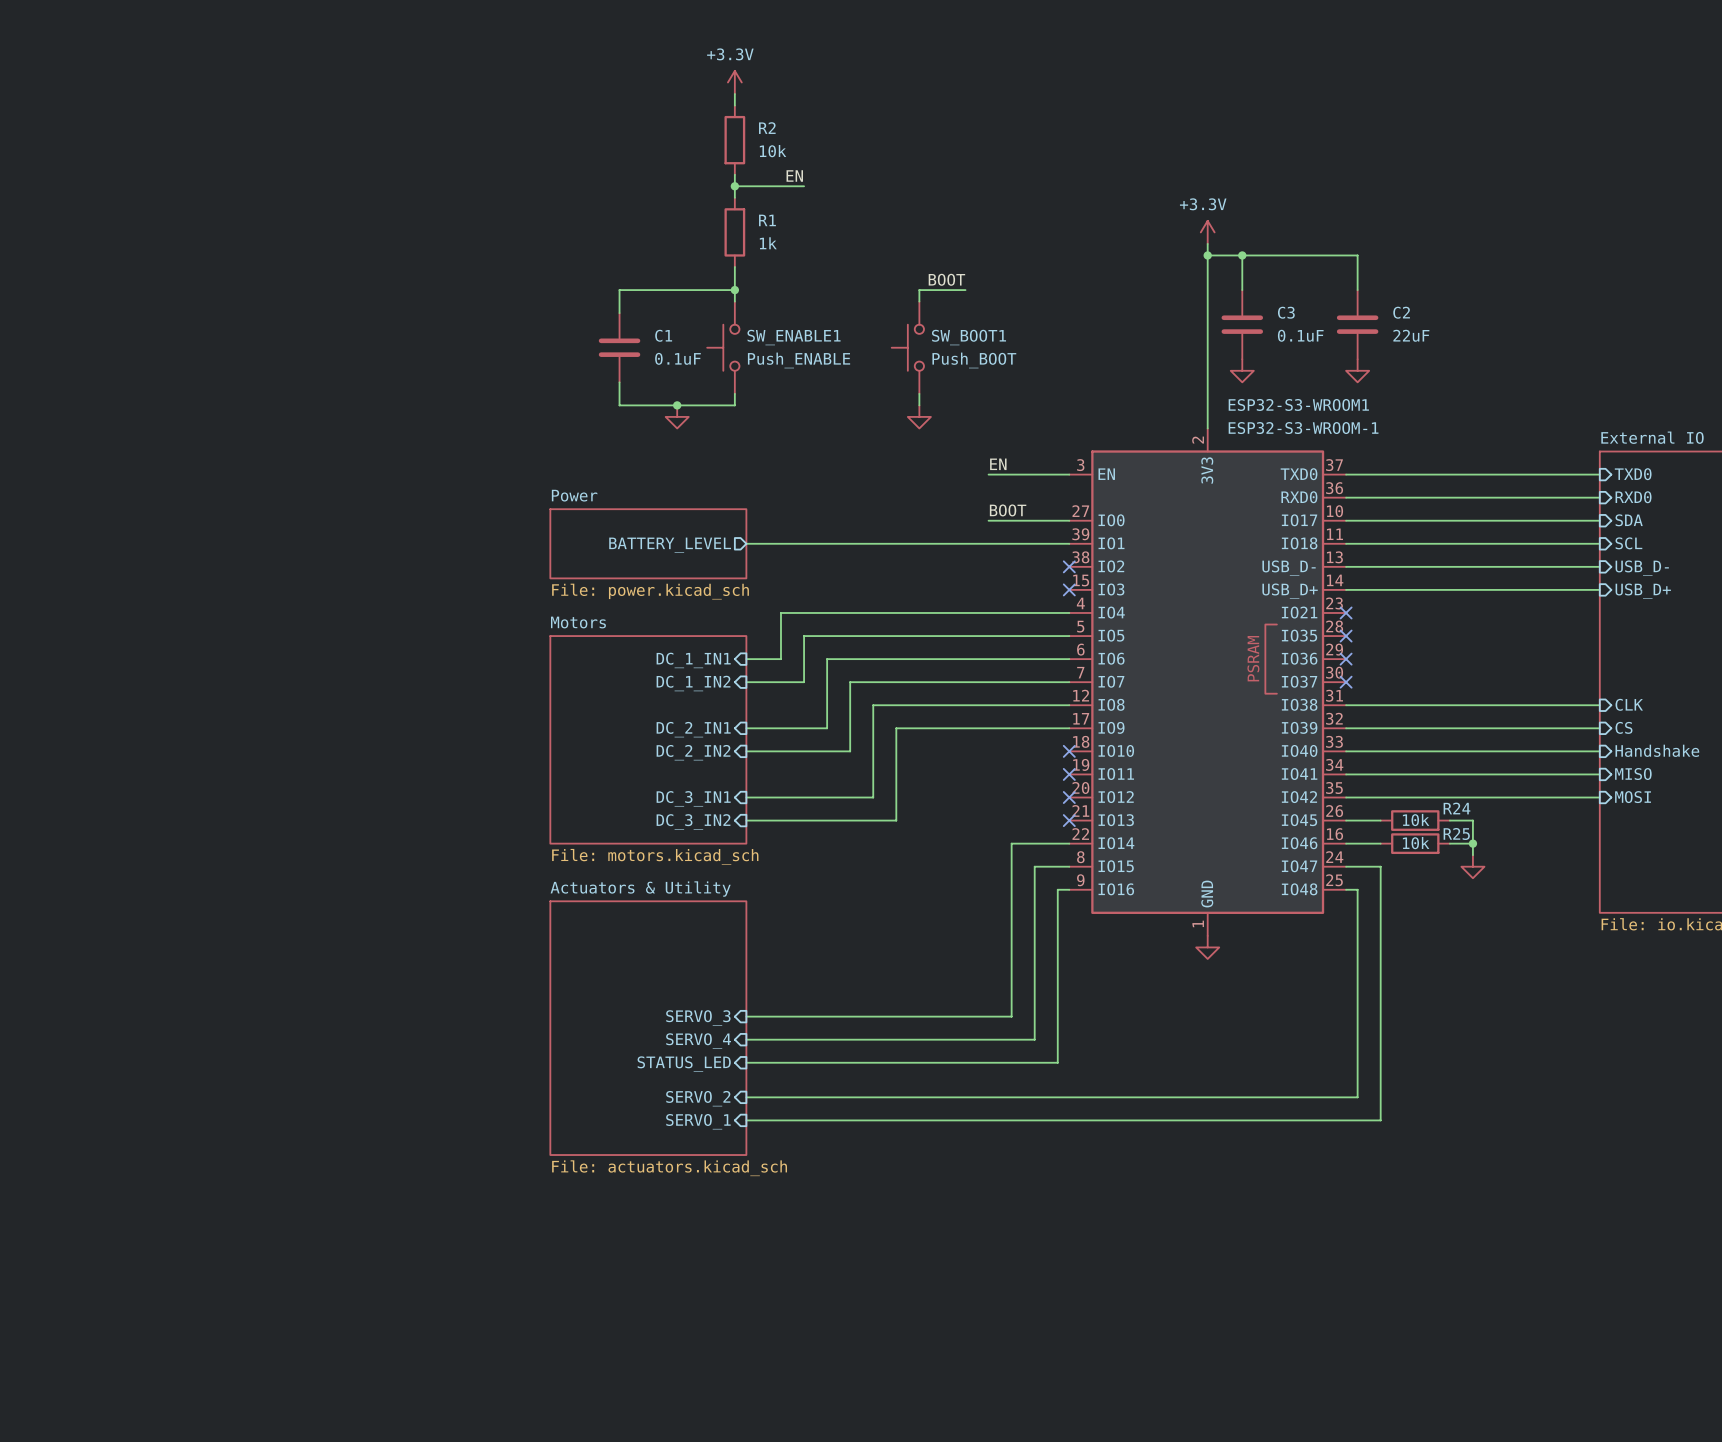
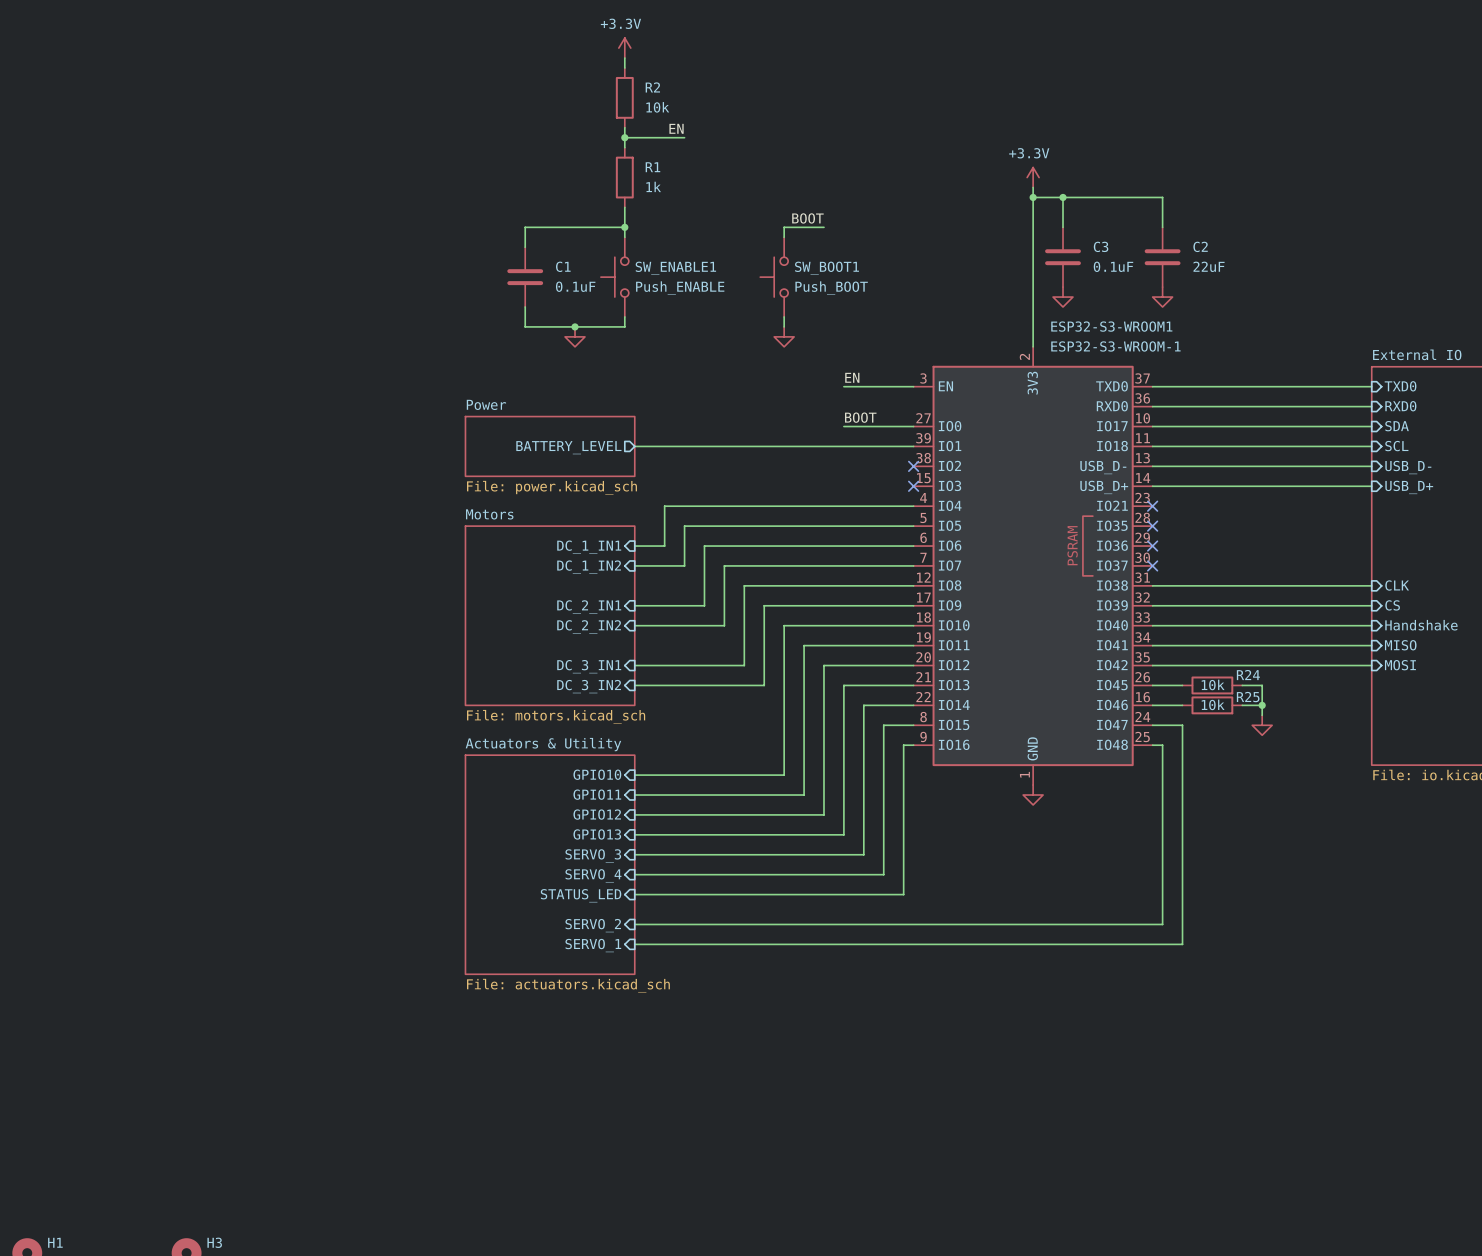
wire: none -> (913, 625) (784, 625) (784, 775) (634, 775)
no-connect mark: (1069, 751) -> none
wire: none -> (913, 645) (804, 645) (804, 795) (634, 795)
no-connect mark: (1069, 774) -> none
wire: none -> (913, 665) (823, 665) (823, 814) (634, 814)
no-connect mark: (1069, 797) -> none
wire: none -> (913, 685) (843, 685) (843, 834) (634, 834)
no-connect mark: (1069, 820) -> none
sheet pin: none -> GPIO10 (597, 774)
sheet pin: none -> GPIO11 (597, 794)
sheet pin: none -> GPIO12 (597, 814)
sheet pin: none -> GPIO13 (597, 834)

